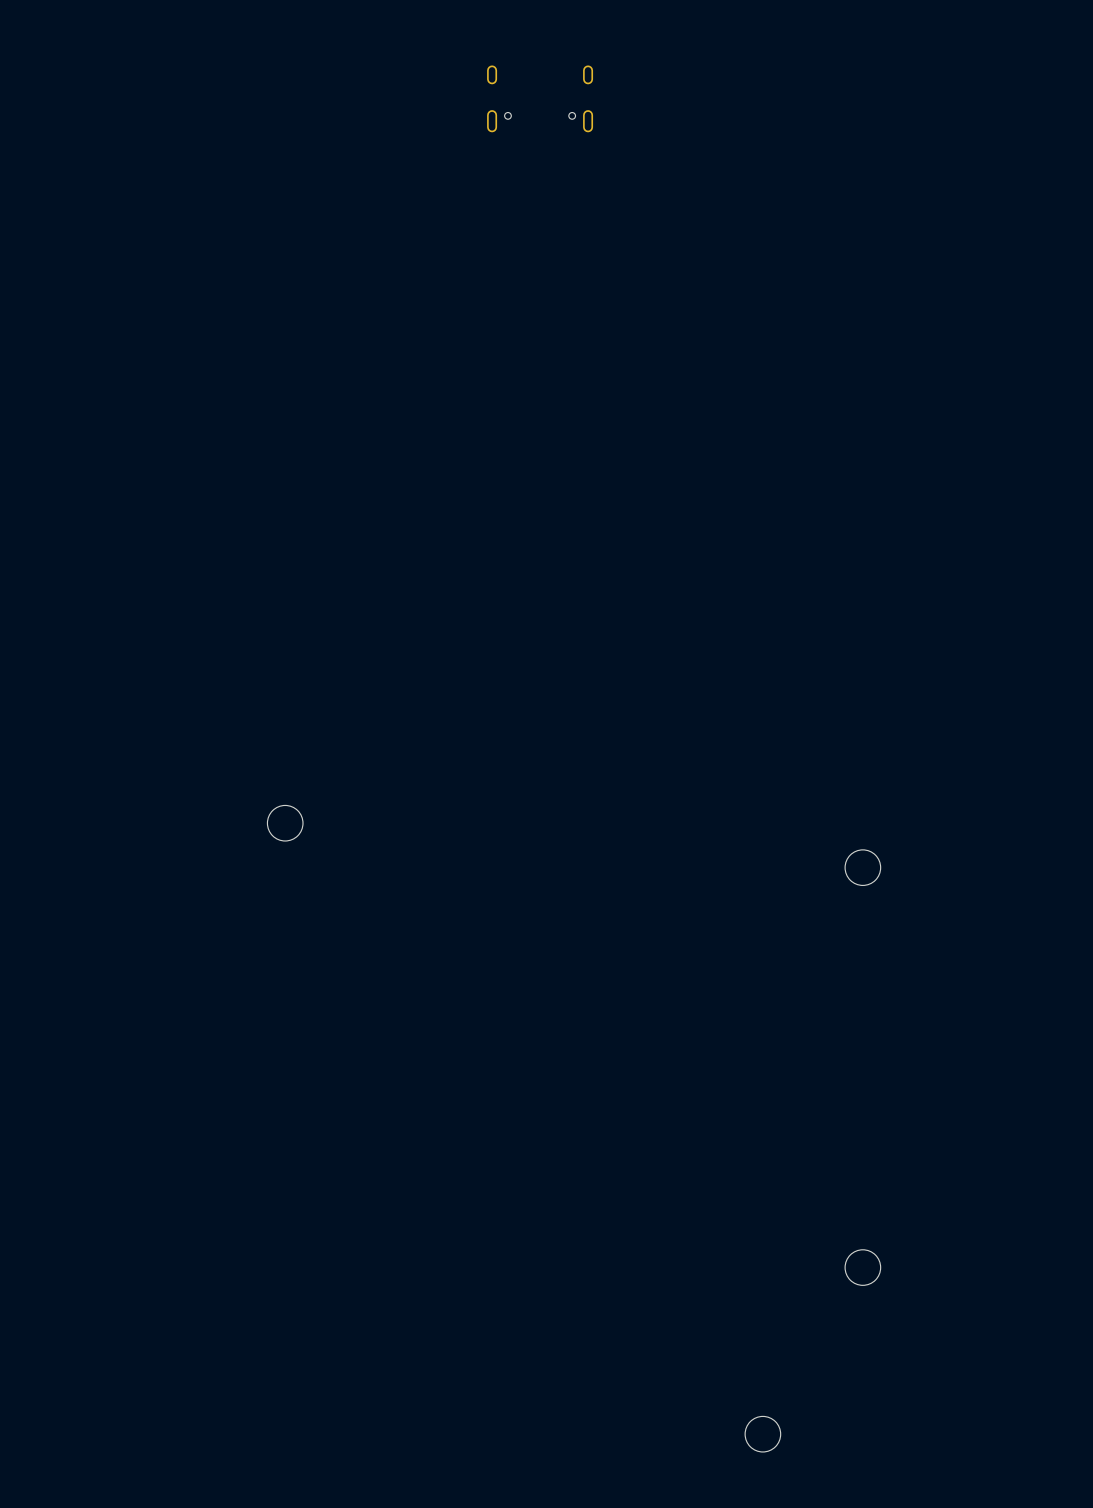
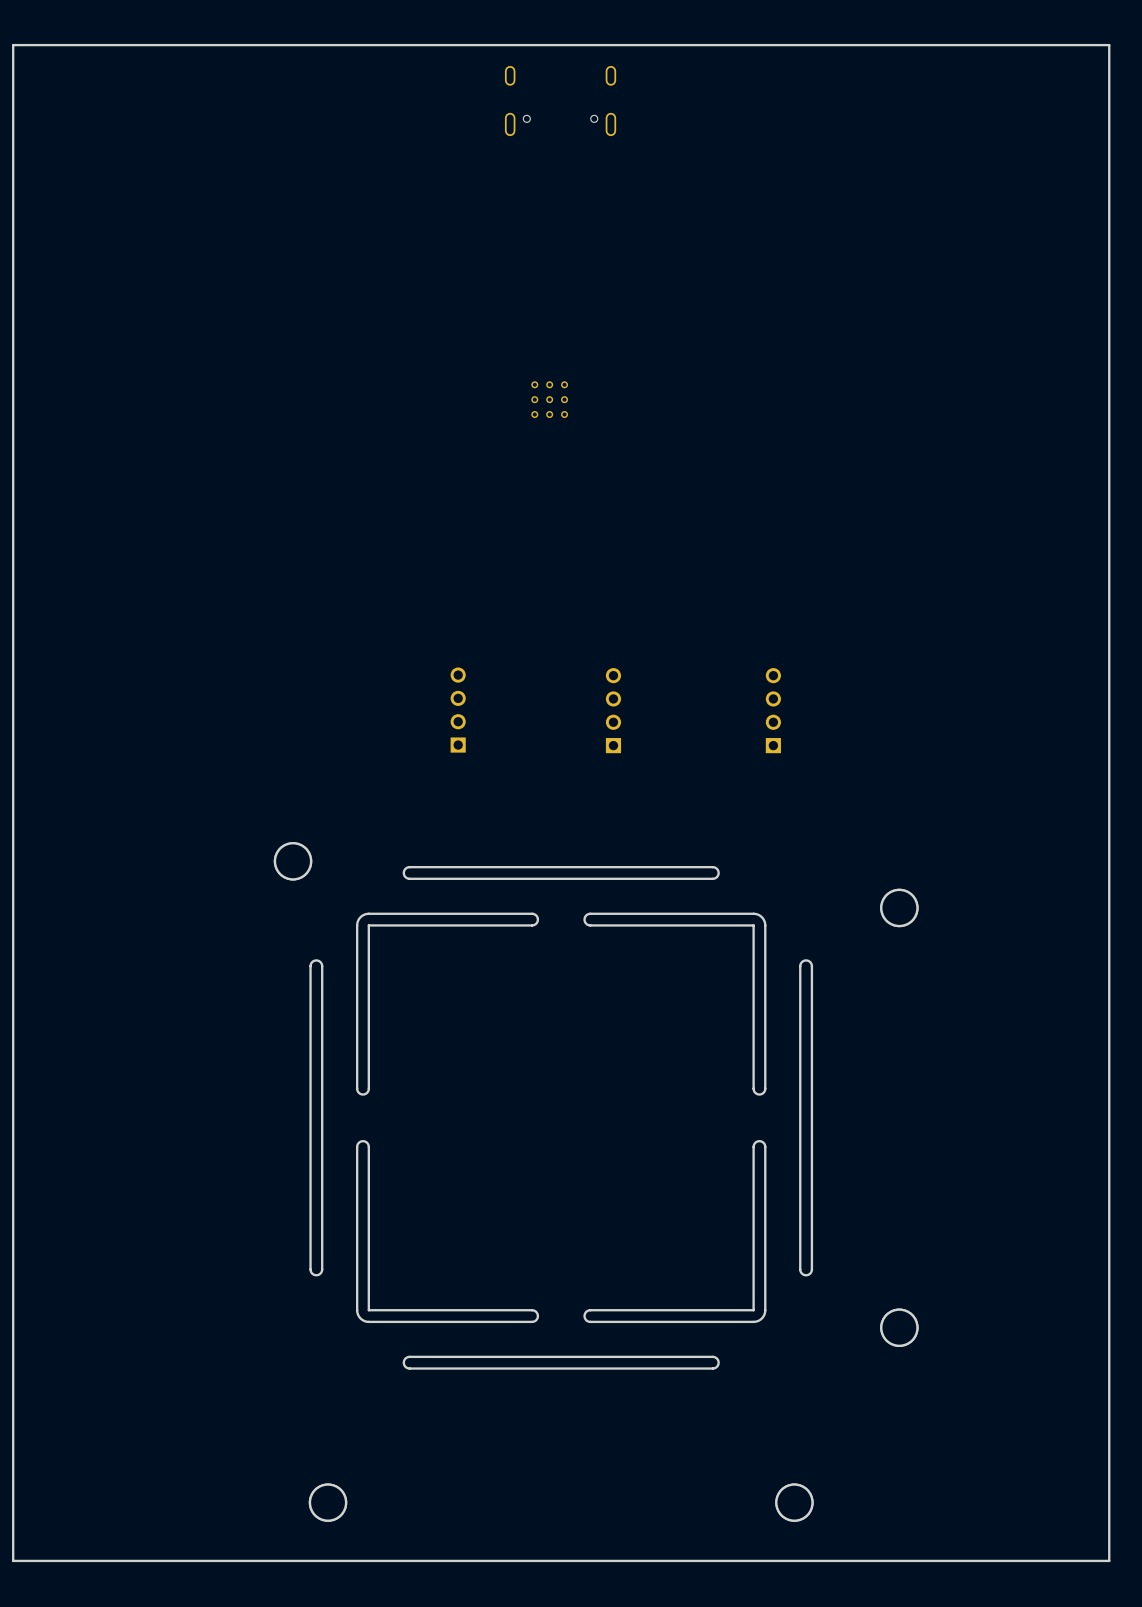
board edge: none -> (1109, 45) (13, 45) (13, 1560) (1109, 1560) (1109, 45)
part: none -> (549, 399)
part: none -> (458, 710)
part: none -> (613, 710)
part: none -> (773, 710)
round board edge: none -> [273, 842, 313, 881]
board edge: none -> (712, 867) (409, 867) (405, 868) (403, 872) (405, 877) (409, 878) (712, 878) (716, 877) (718, 872) (716, 868) (712, 867)
round board edge: none -> [880, 888, 919, 928]
board edge: none -> (532, 913) (368, 913) (360, 917) (357, 925) (357, 1088) (358, 1092) (365, 1094) (368, 1088) (368, 925) (532, 925) (536, 923) (537, 918) (532, 913)
board edge: none -> (753, 913) (590, 913) (586, 915) (584, 919) (586, 923) (590, 925) (753, 925) (753, 1088) (755, 1092) (759, 1094) (763, 1092) (765, 1088) (765, 925) (761, 917) (753, 913)
board edge: none -> (322, 966) (322, 1269) (320, 1273) (316, 1275) (312, 1273) (310, 1269) (310, 966) (312, 962) (316, 960) (320, 962) (322, 966)
board edge: none -> (811, 966) (811, 1269) (810, 1273) (806, 1275) (801, 1273) (800, 1269) (800, 966) (801, 962) (806, 960) (810, 962) (811, 966)
board edge: none -> (368, 1146) (368, 1310) (532, 1310) (537, 1313) (536, 1320) (532, 1321) (368, 1321) (360, 1318) (357, 1310) (357, 1146) (358, 1142) (362, 1141) (367, 1142) (368, 1146)
board edge: none -> (765, 1146) (765, 1310) (761, 1318) (753, 1321) (590, 1321) (586, 1320) (584, 1313) (590, 1310) (753, 1310) (753, 1146) (759, 1141) (763, 1142) (765, 1146)
round board edge: none -> [880, 1308, 919, 1347]
board edge: none -> (712, 1356) (409, 1356) (405, 1358) (403, 1362) (405, 1366) (409, 1368) (712, 1368) (716, 1366) (718, 1362) (716, 1358) (712, 1356)
round board edge: none -> [308, 1483, 348, 1522]
round board edge: none -> [775, 1483, 814, 1522]

